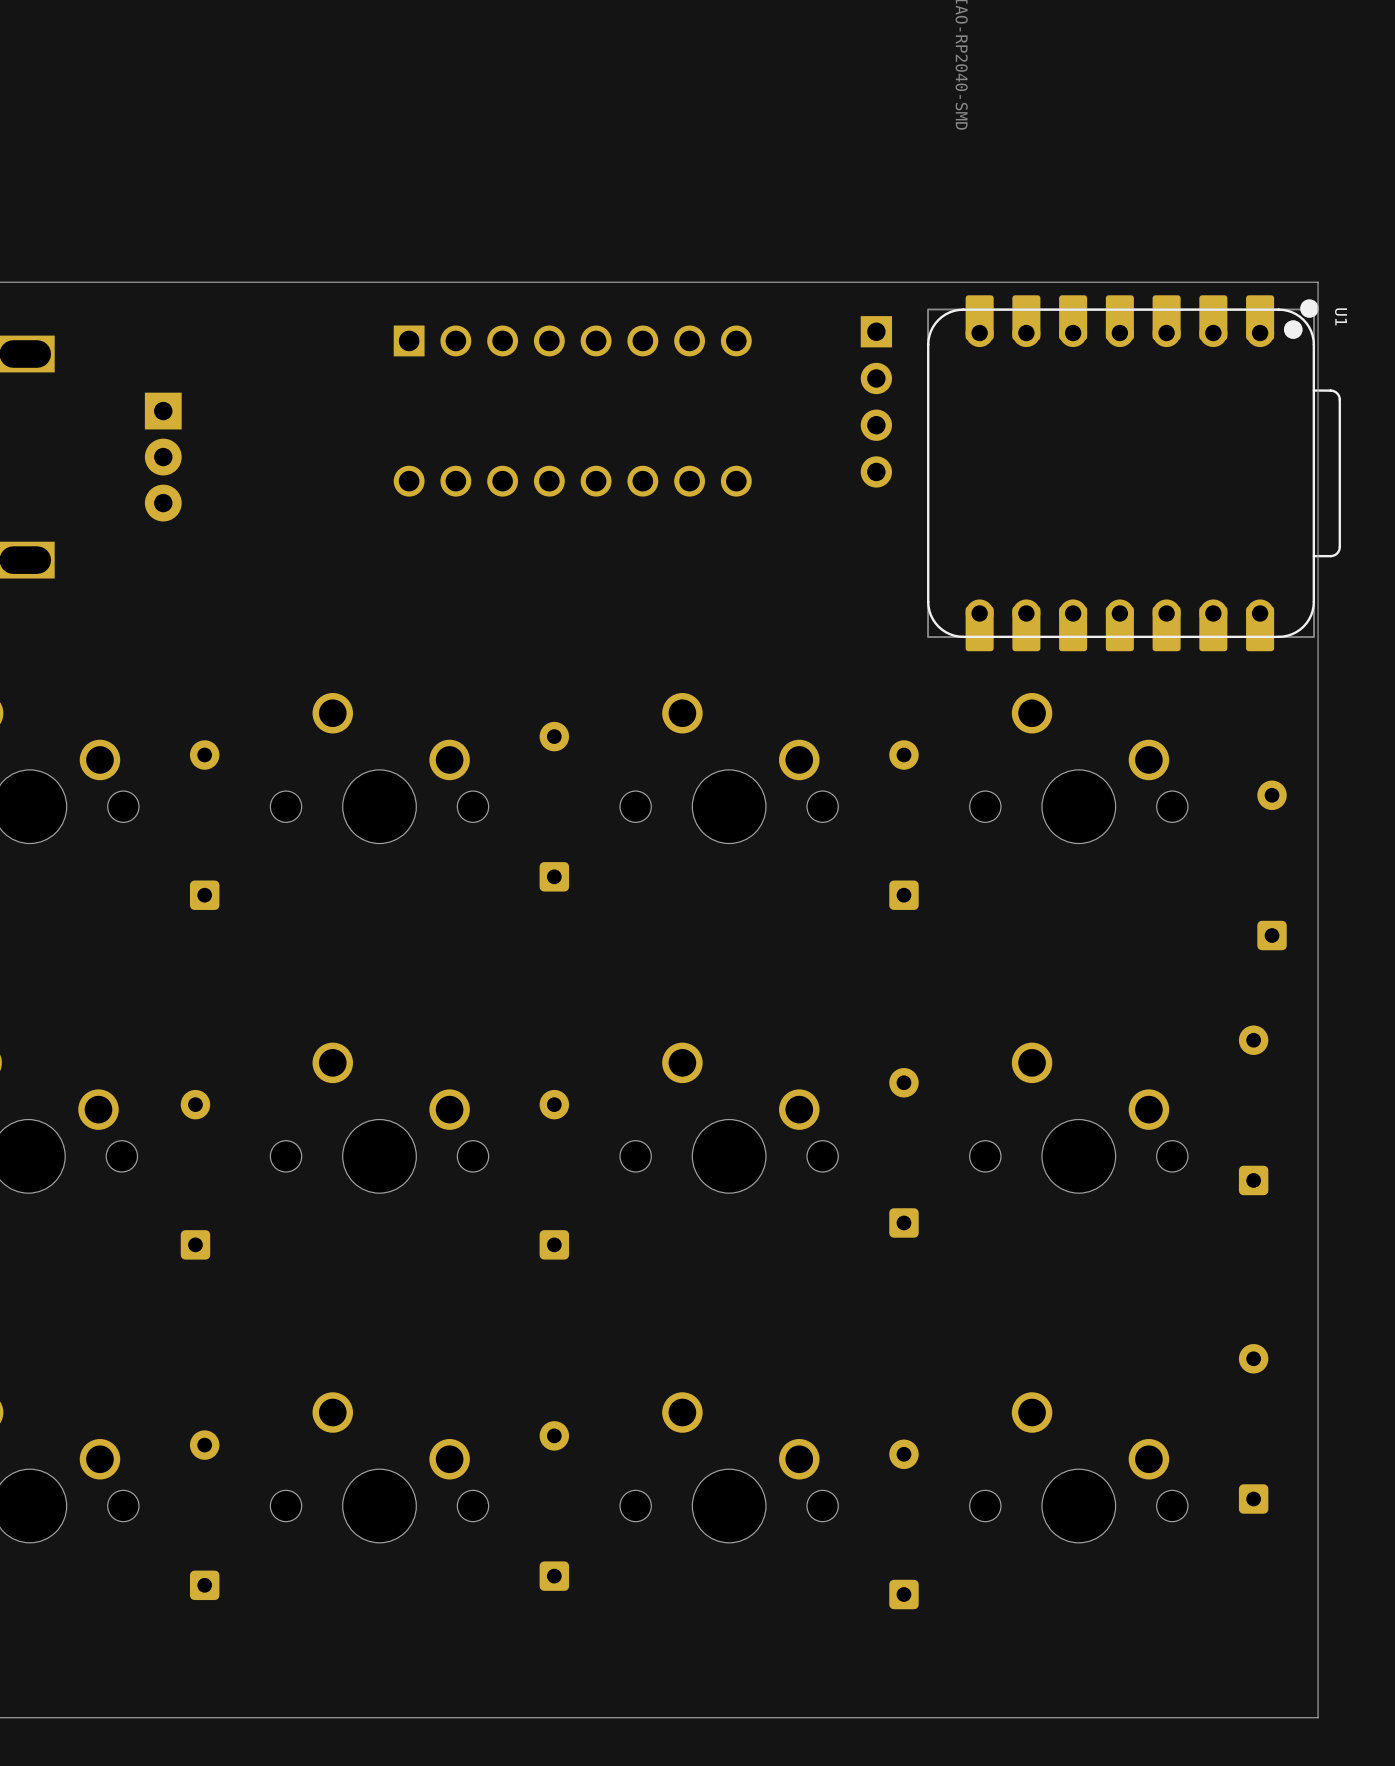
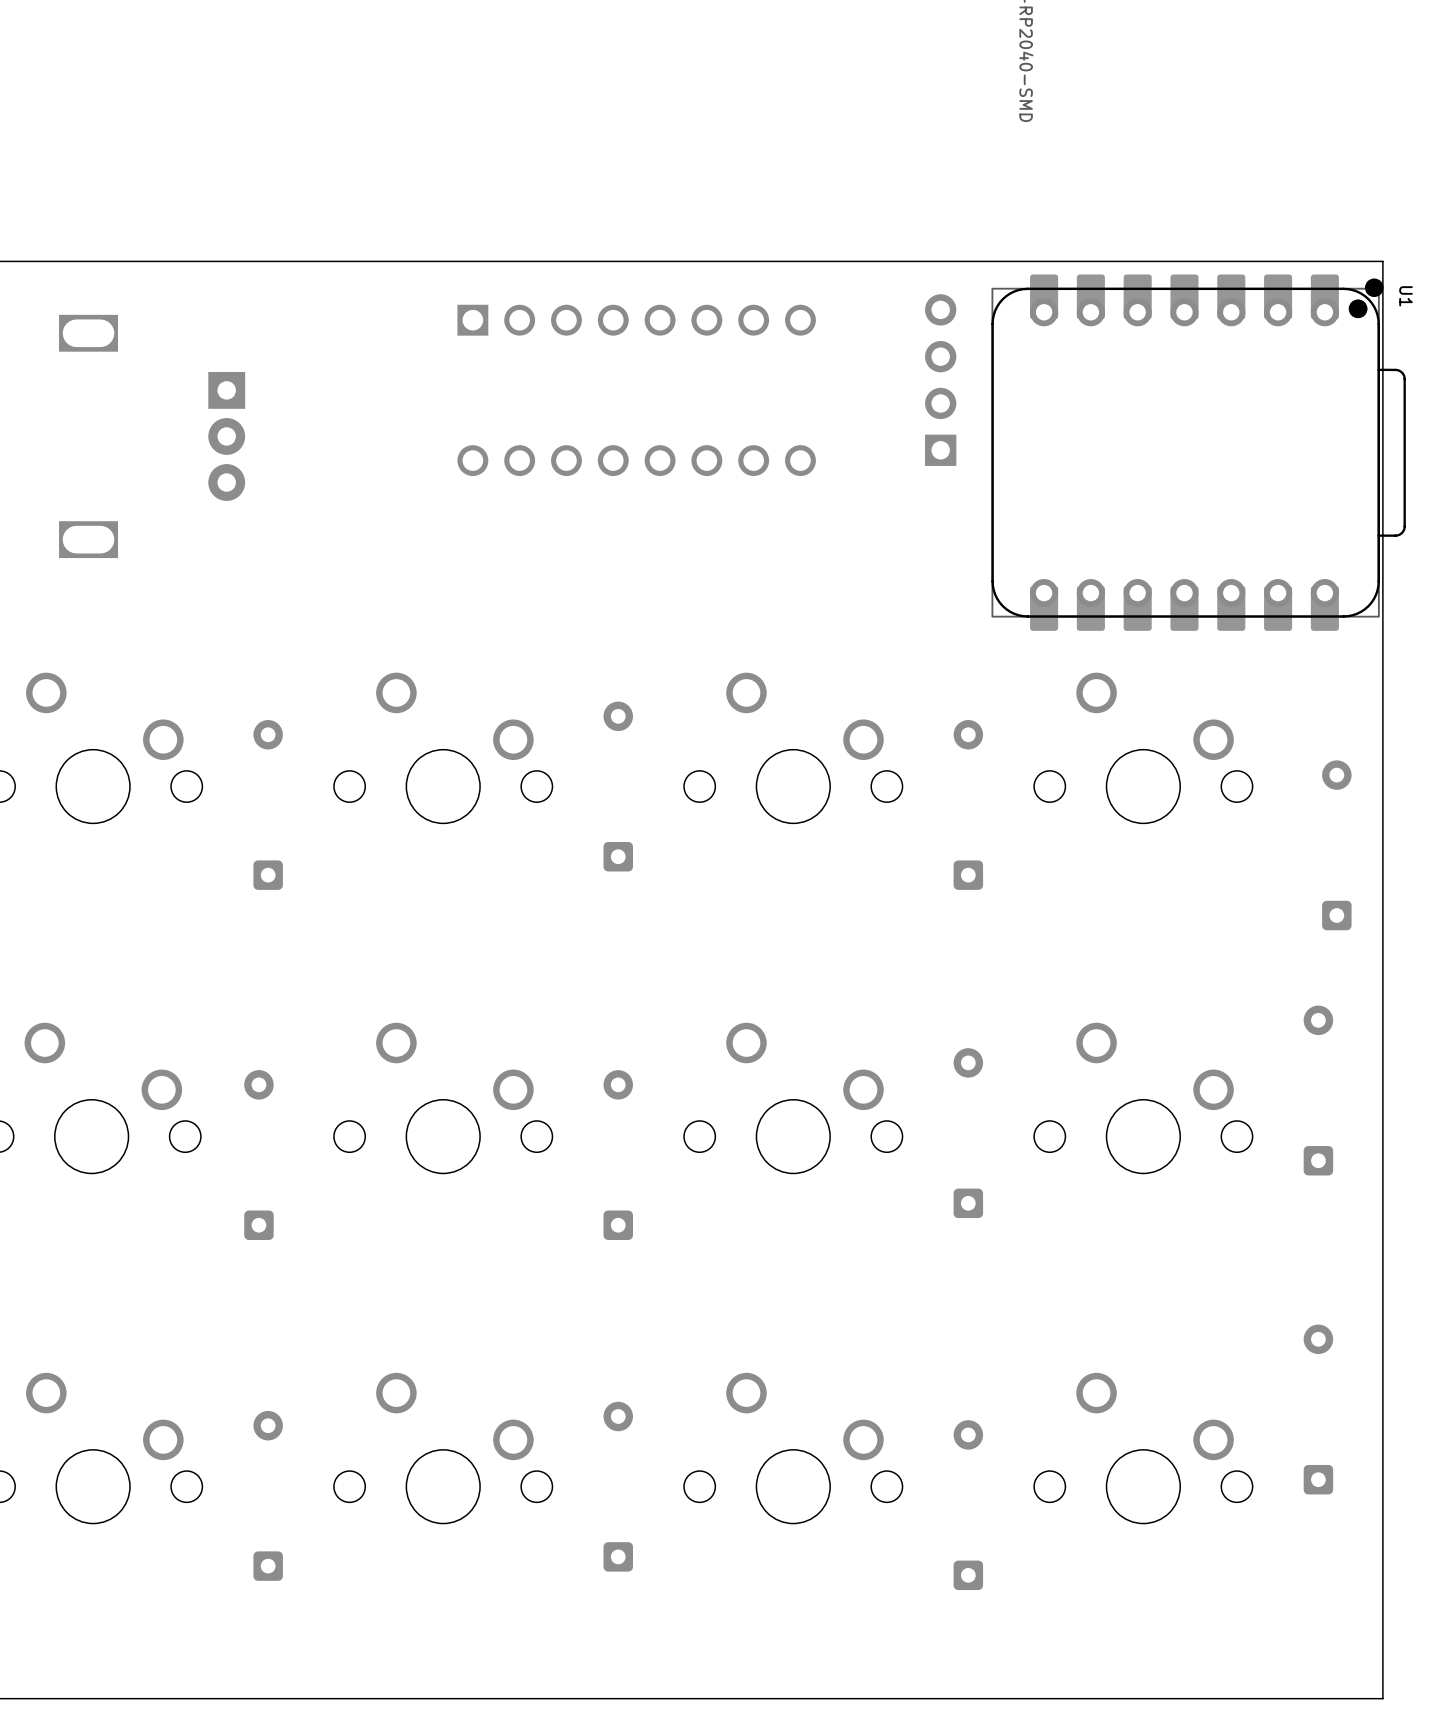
part rotation: 0° (876, 401) -> 180° (940, 380)

